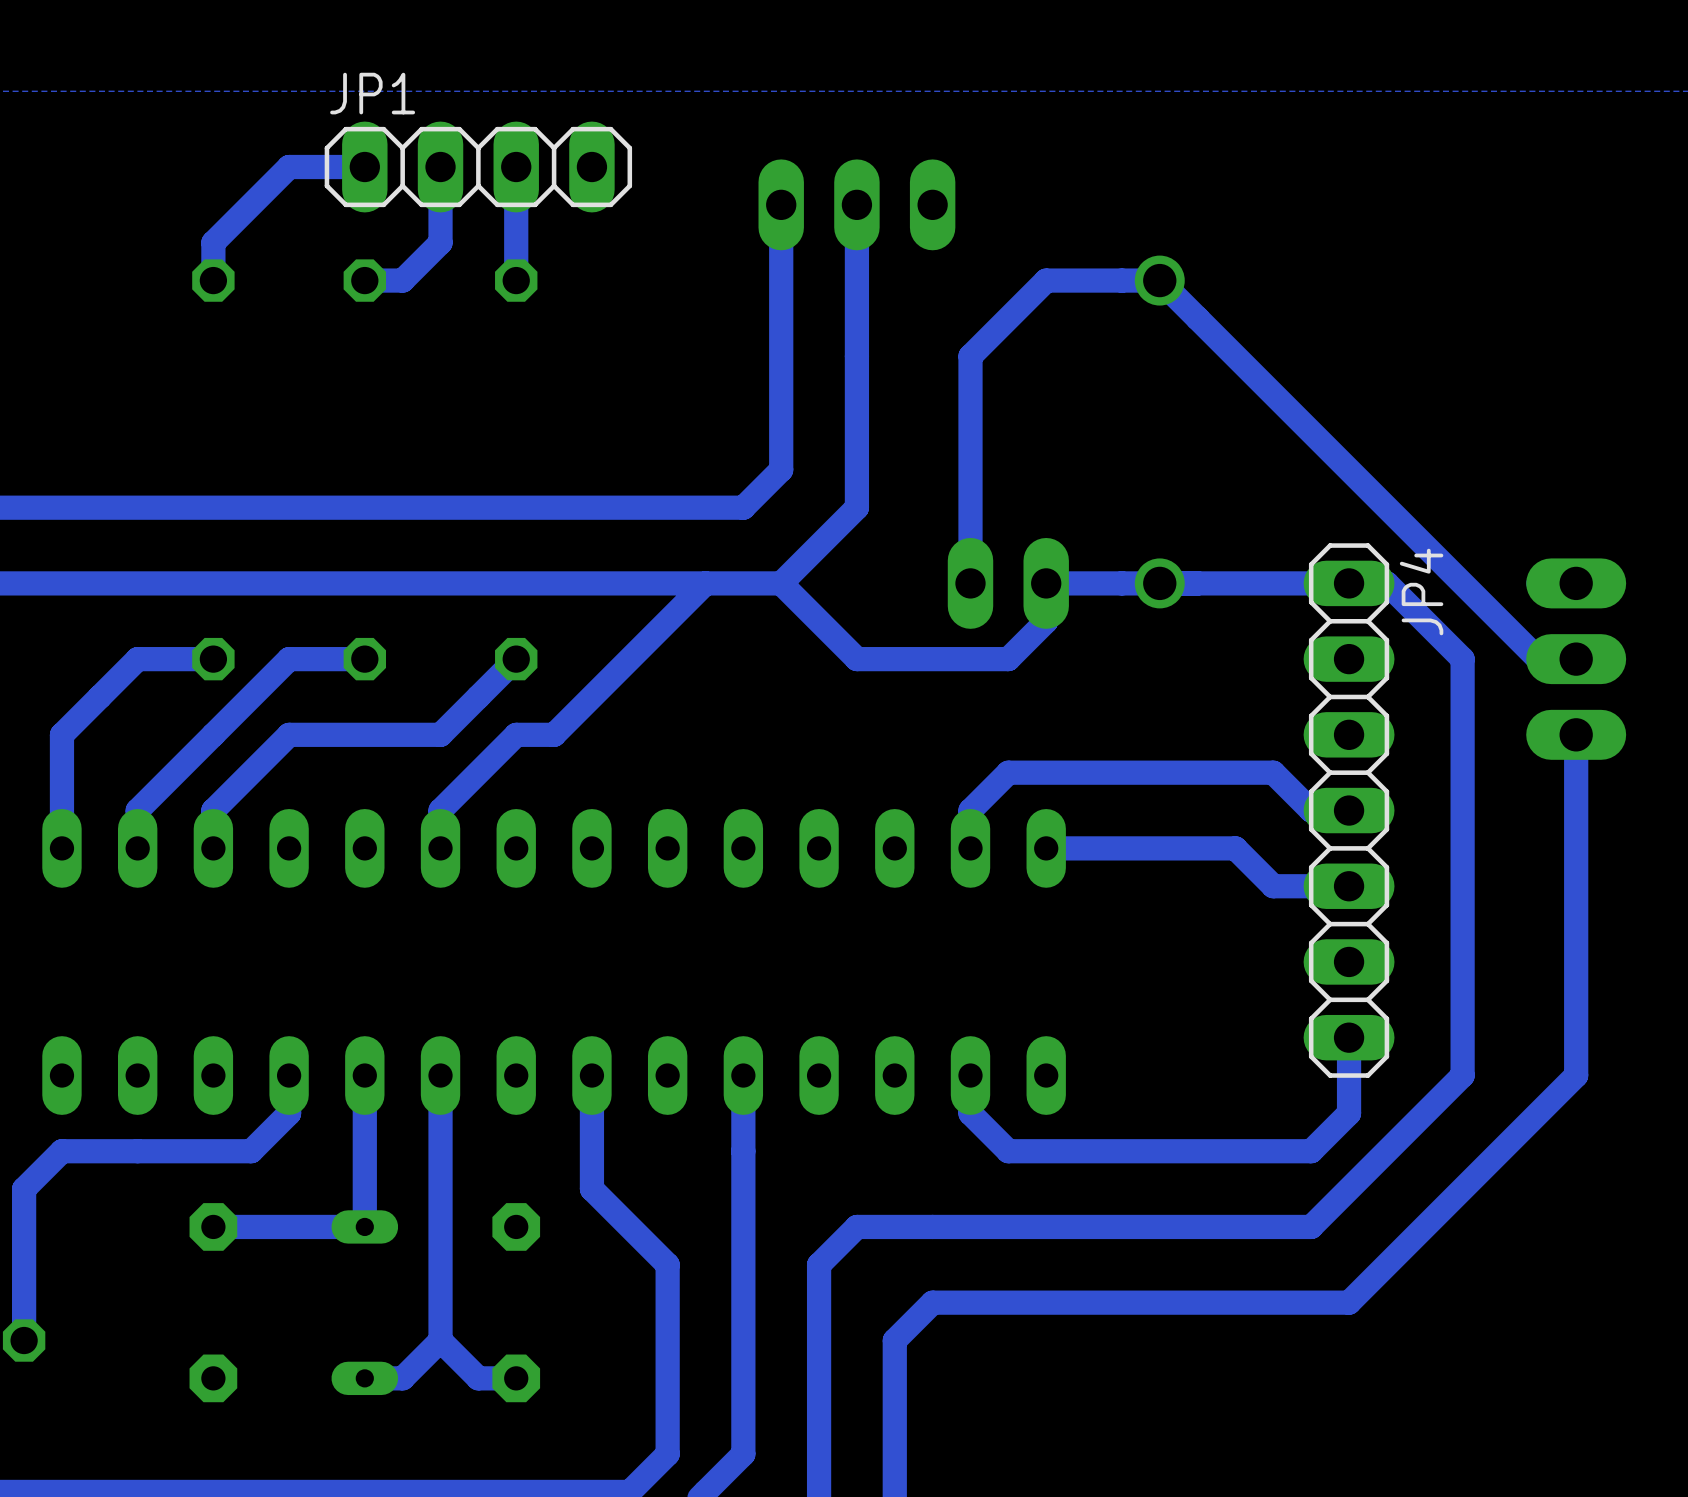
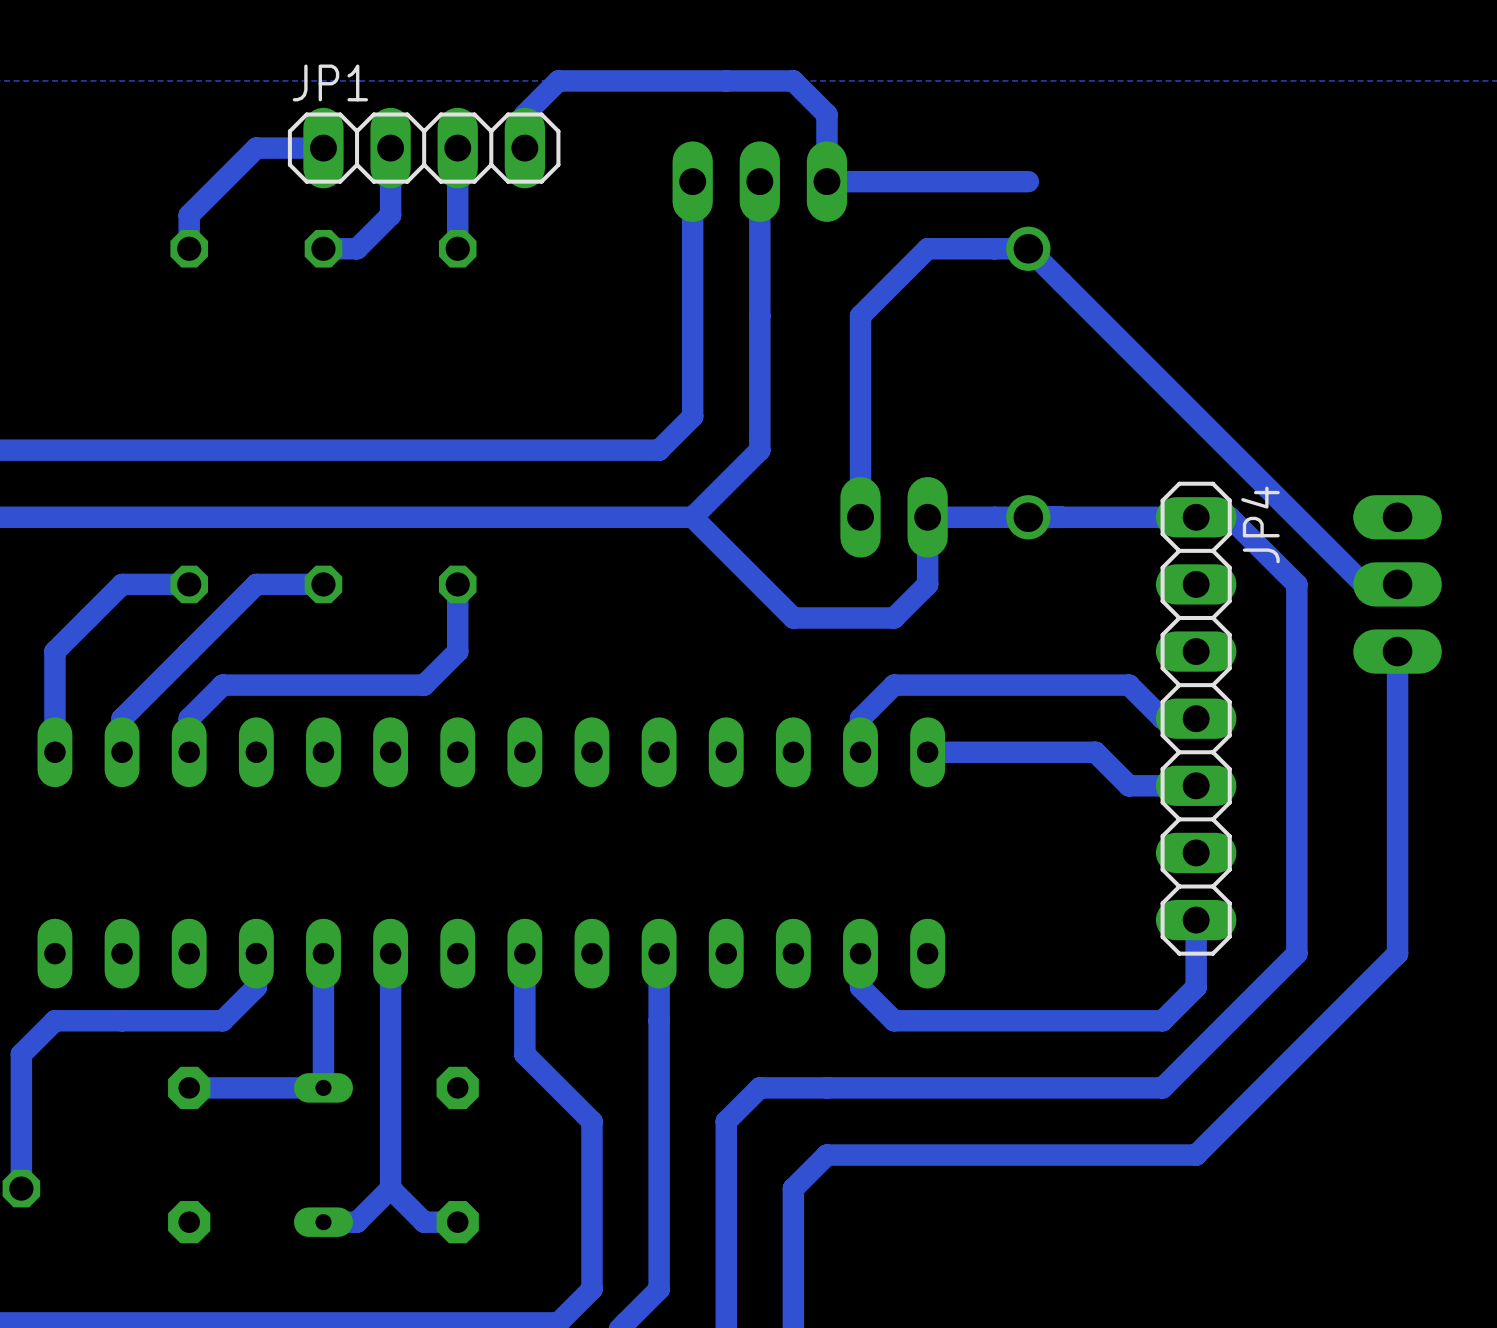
track: none -> (524, 148) (524, 114) (558, 80) (793, 80) (826, 114) (826, 181) (1028, 181)
track: (705, 583) (554, 734) (516, 734) -> (457, 584) (457, 651)
track: (1046, 621) (1008, 659) (856, 659) -> (927, 550) (927, 584) (894, 617) (793, 617) (759, 584)
track: (516, 659) (440, 734) (289, 734) (251, 772) -> (424, 685) (222, 685)
track: (478, 772) (440, 810) (440, 848) -> none

